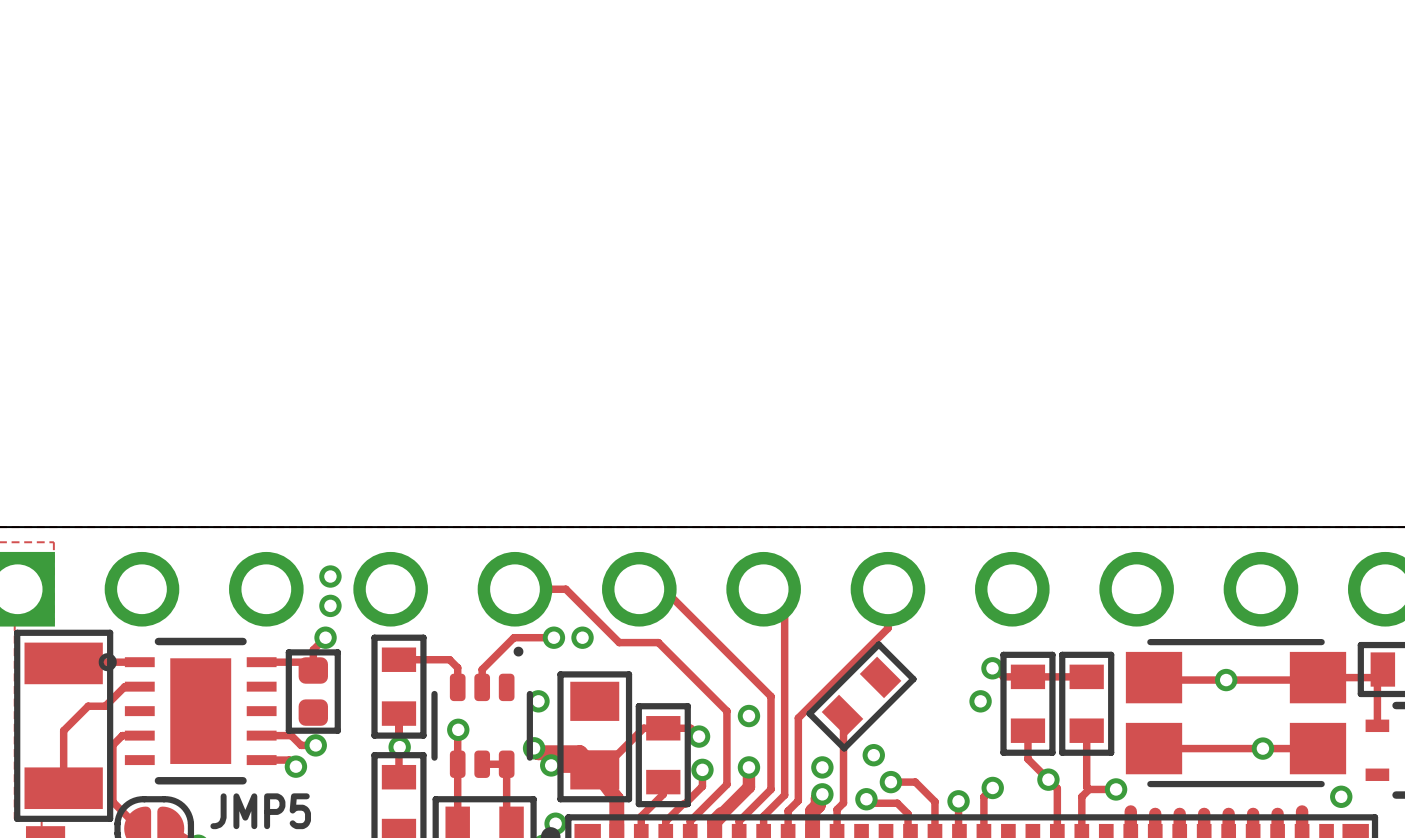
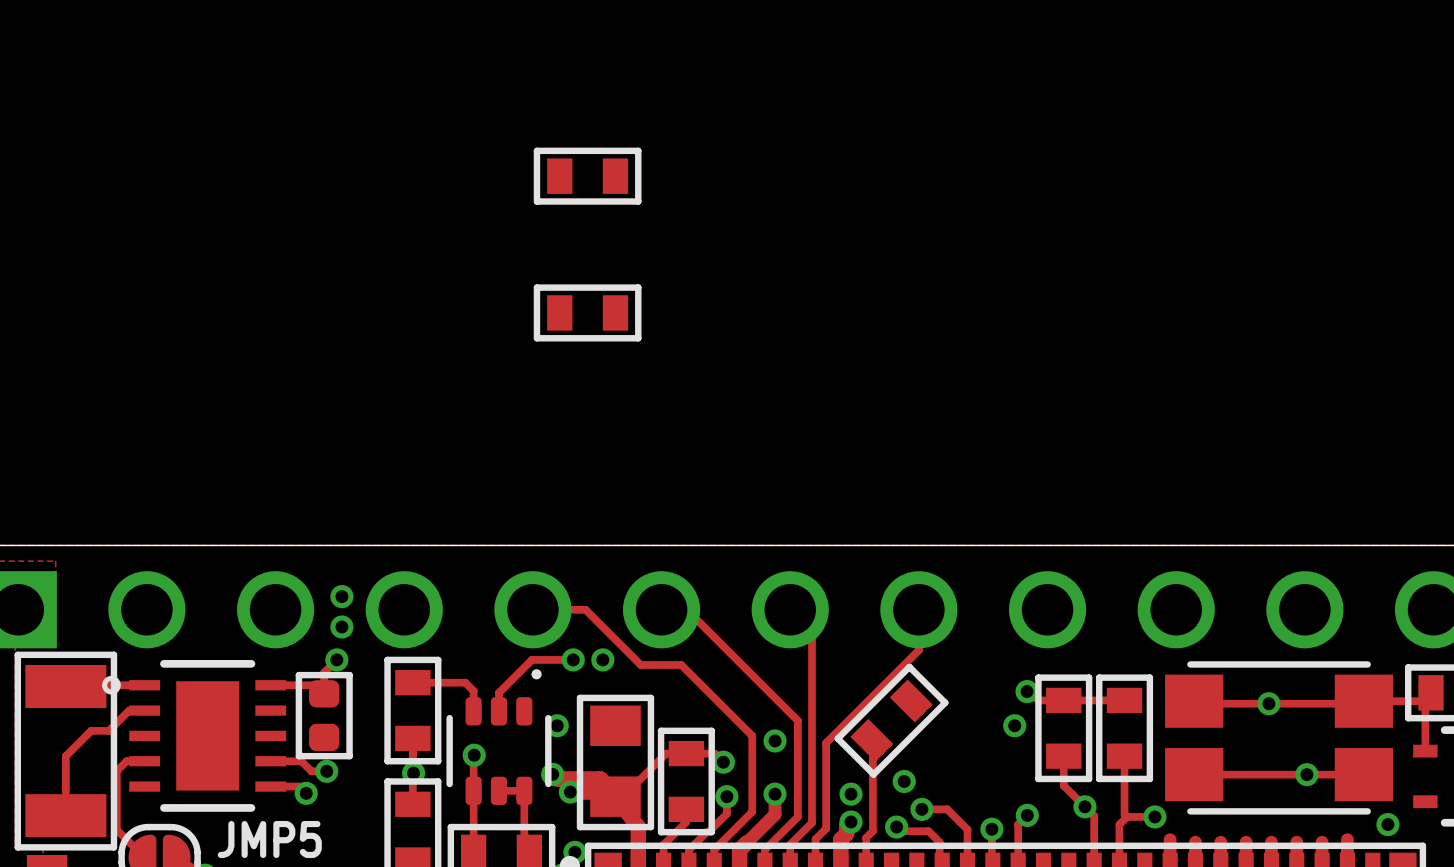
part: none -> (587, 176)
part: none -> (587, 312)

